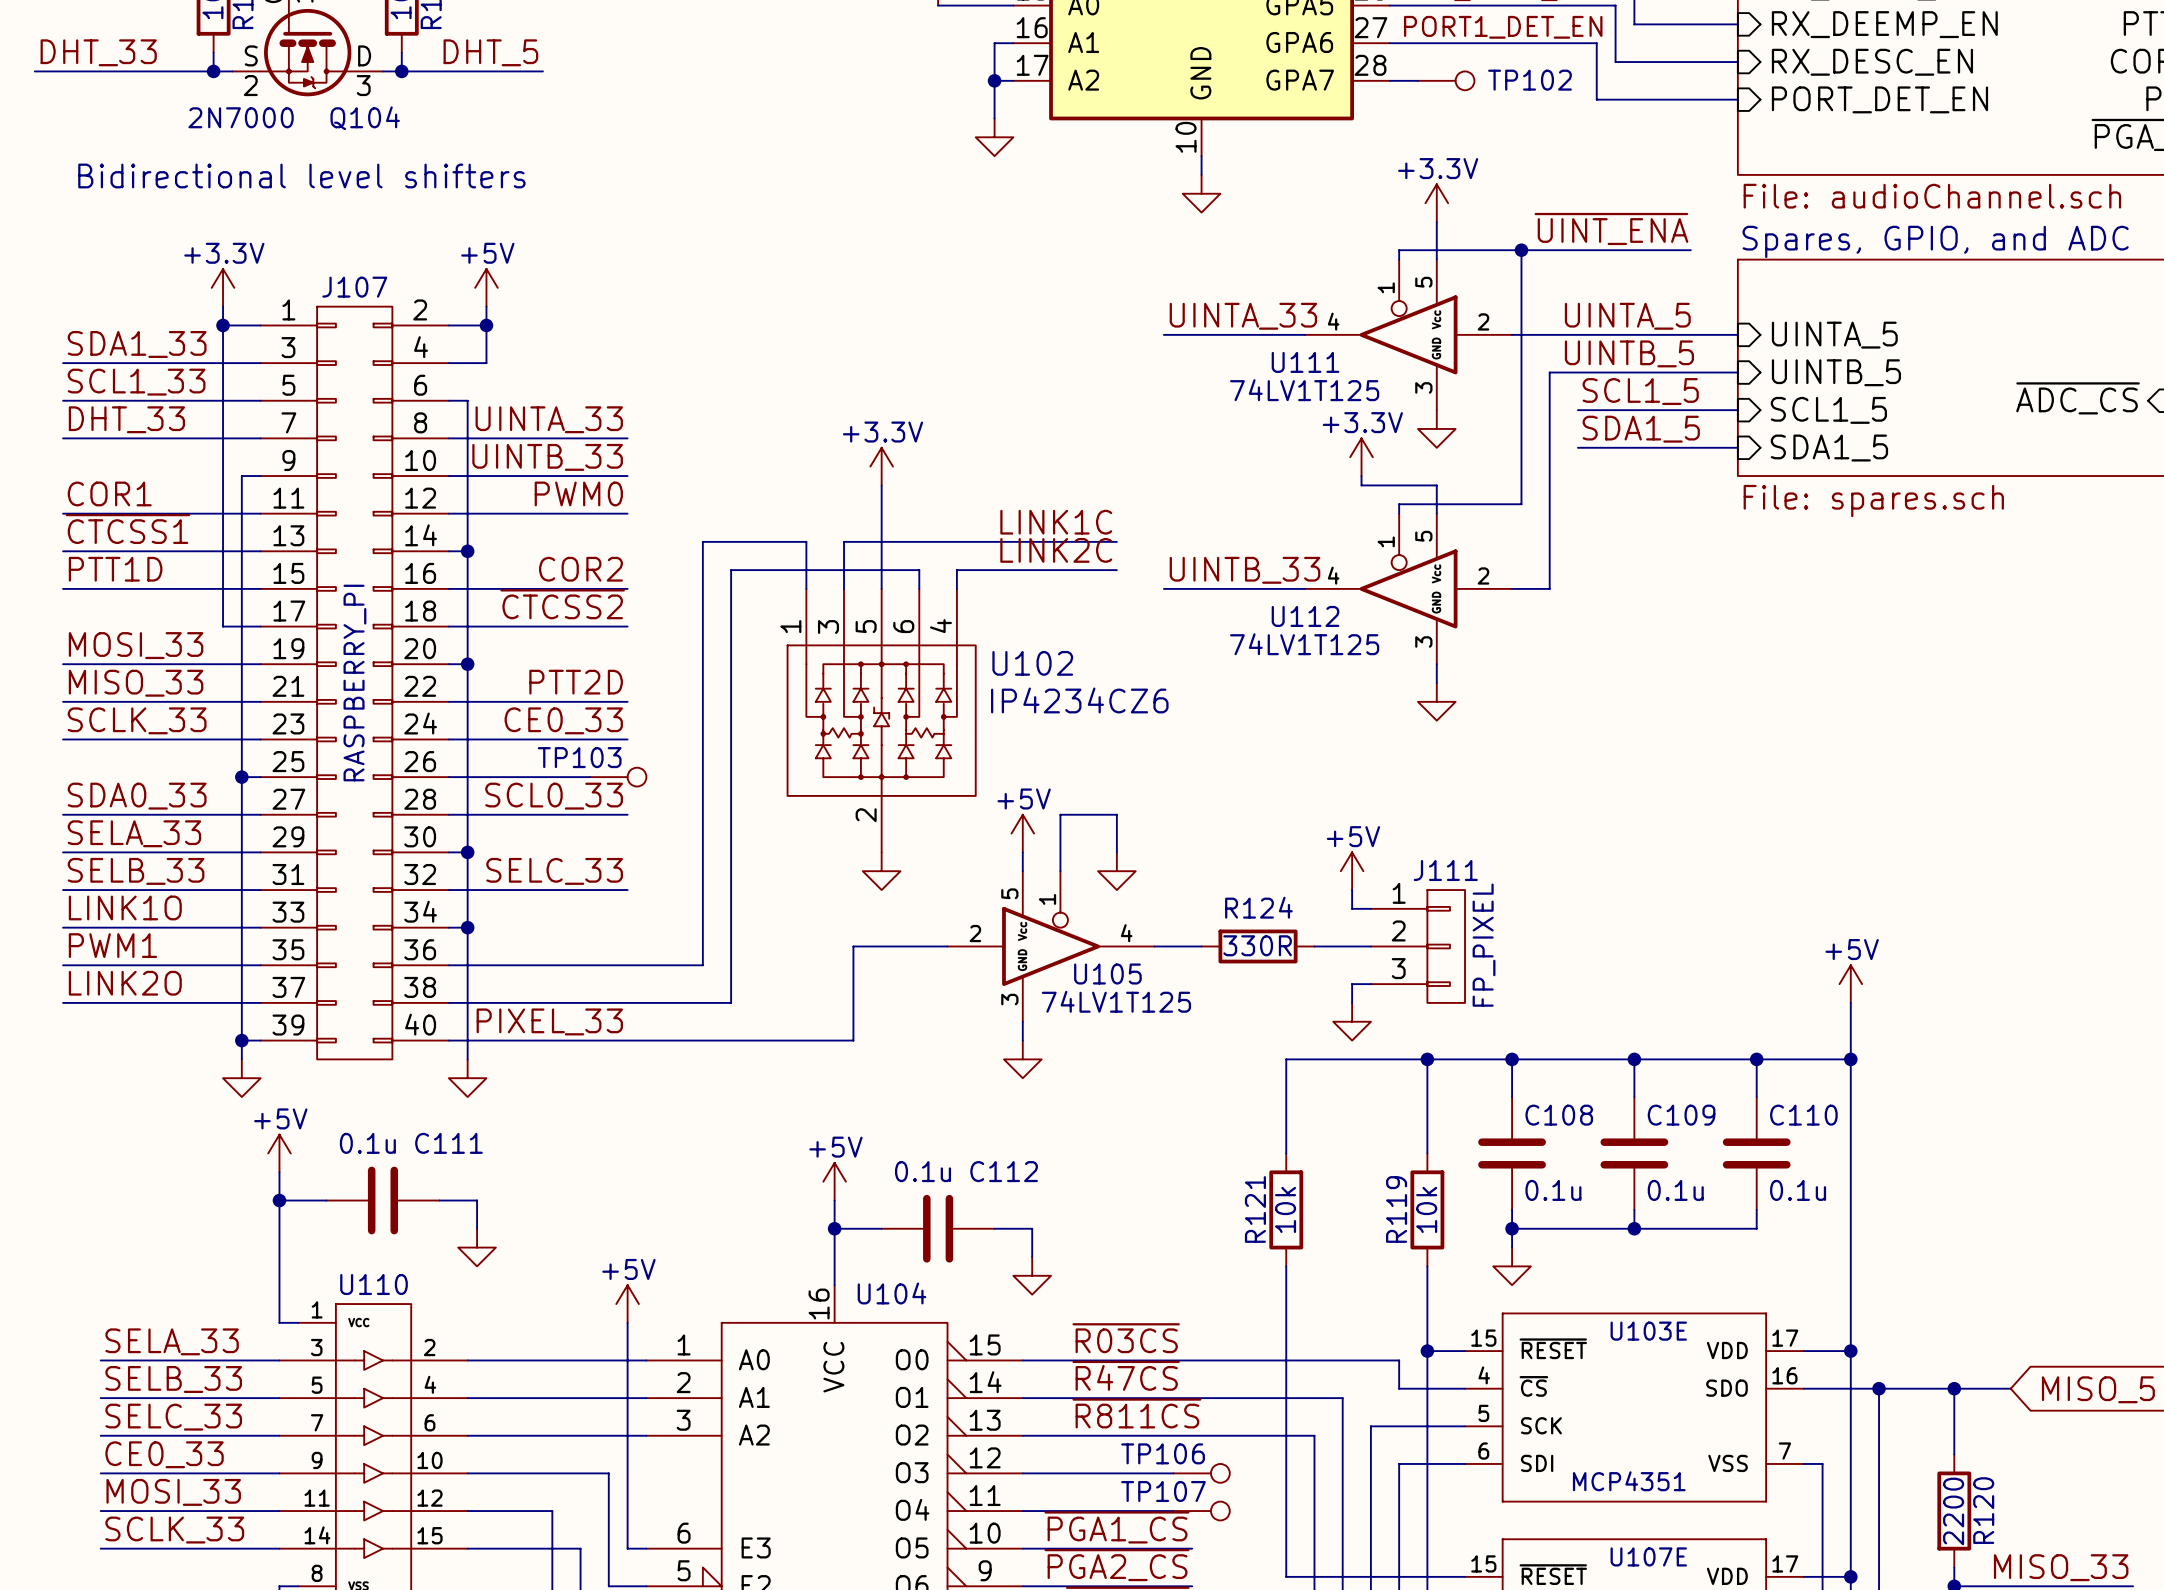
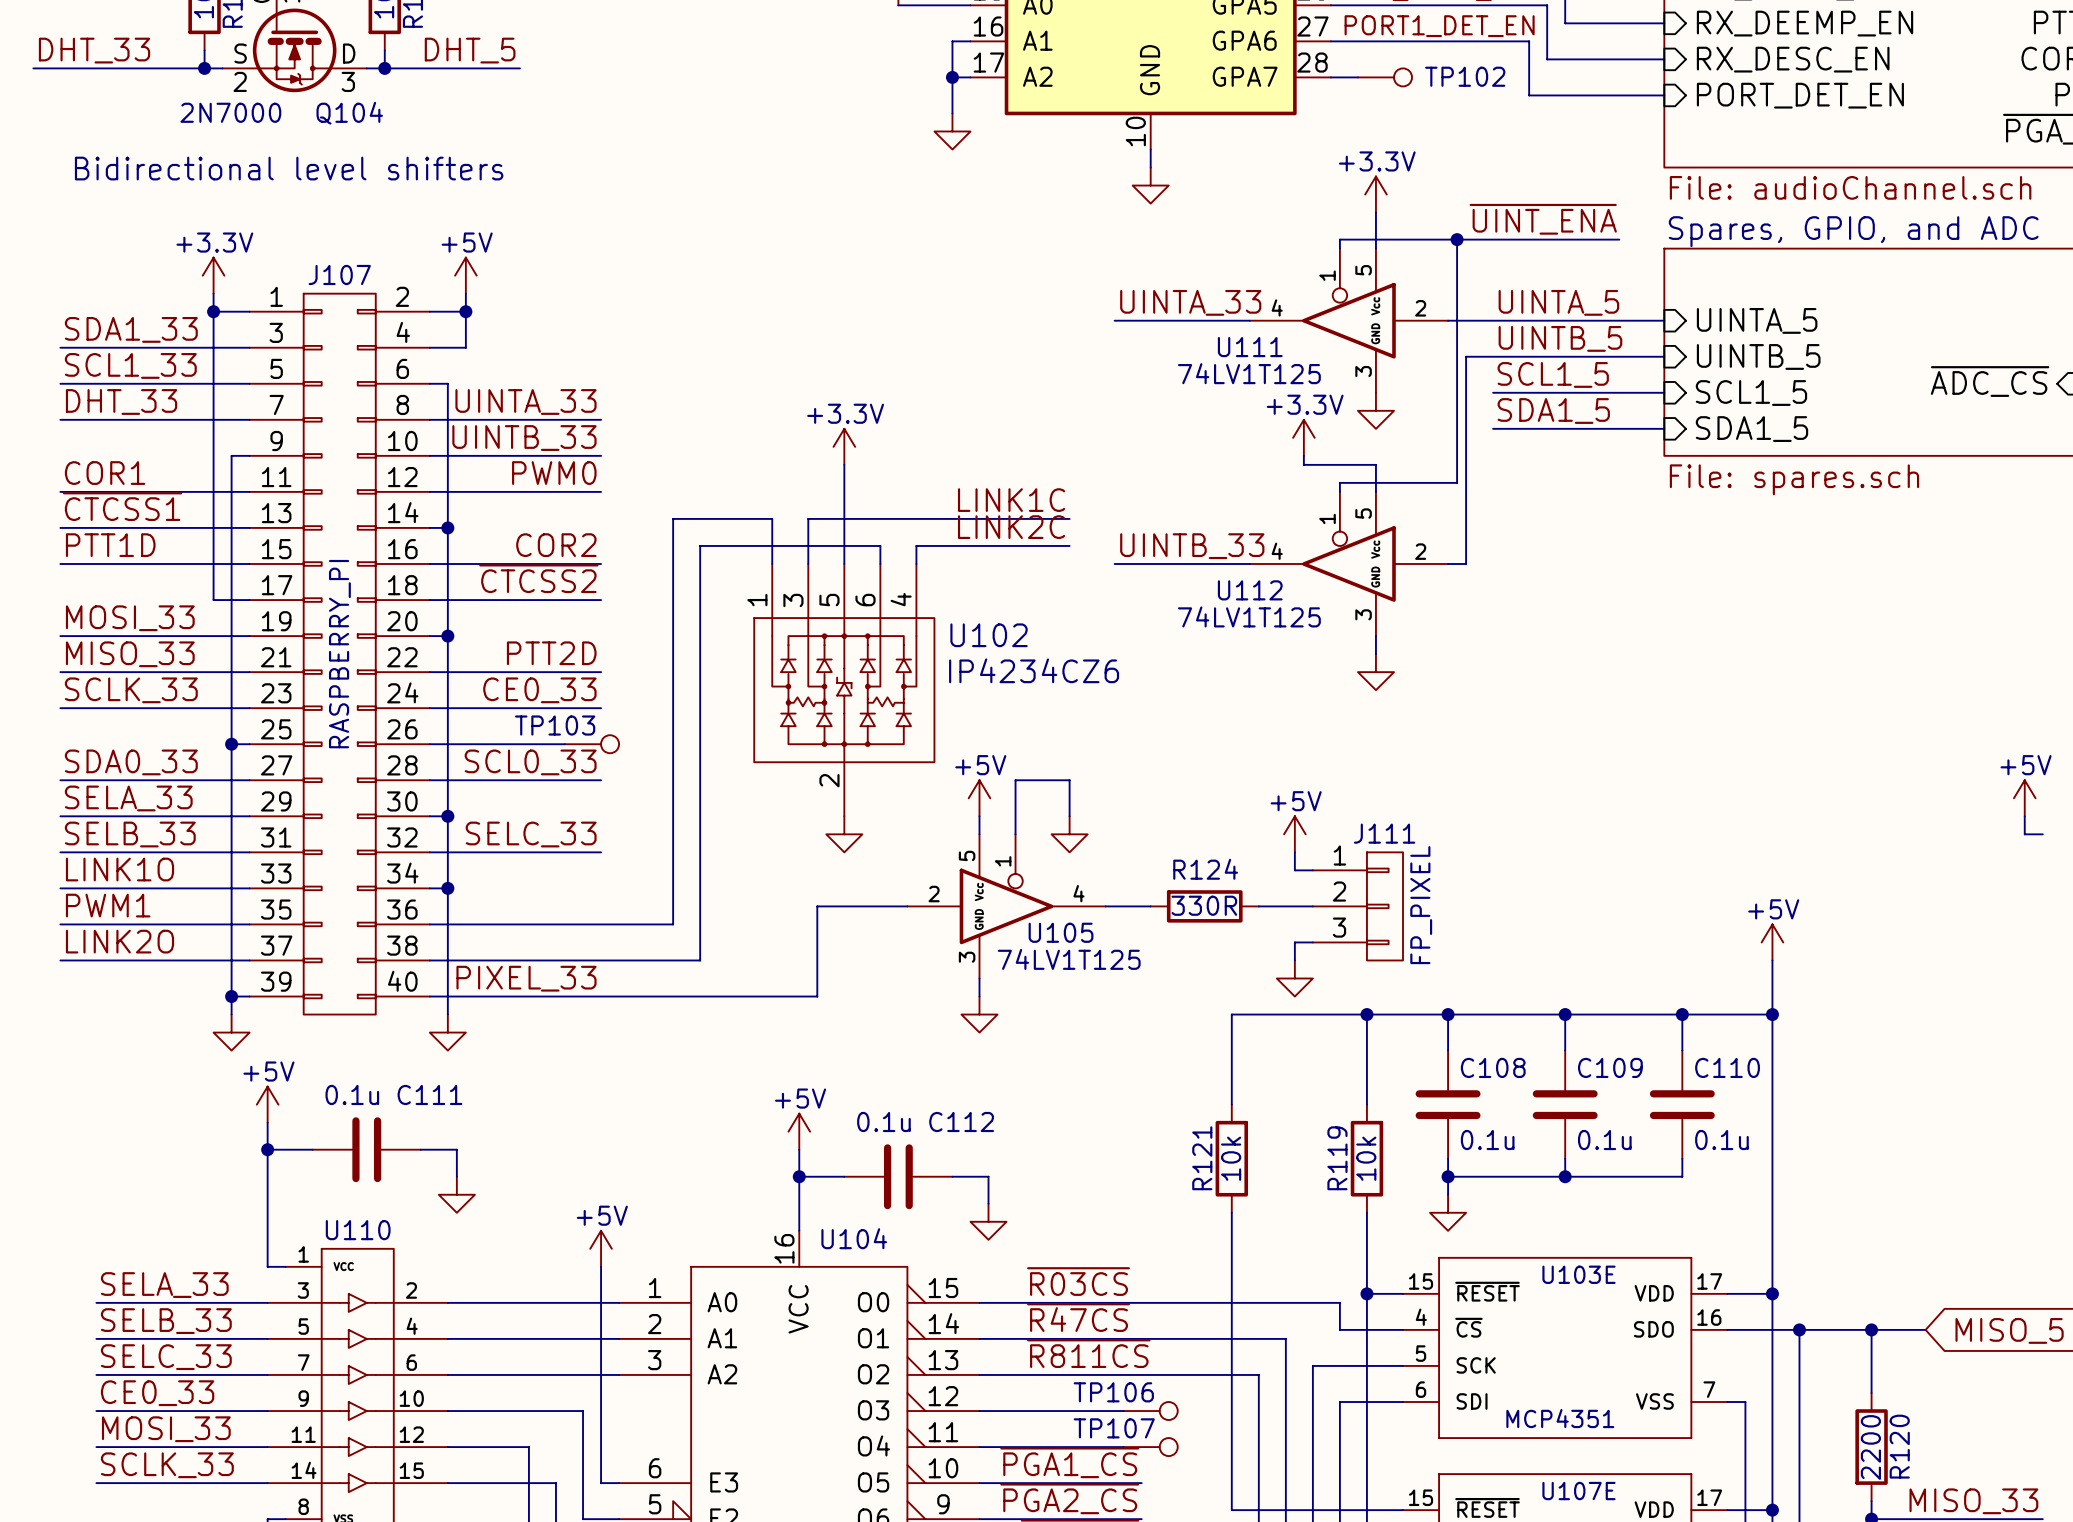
wire: (1549, 372) (1549, 588) (1530, 588) -> (1484, 356) (1466, 356) (1466, 564)
label position: SCL1_5 (1640, 391) -> SCL1_5 (1553, 374)
wire: none -> (1493, 392) (1511, 392)
label position: SDA1_5 (1641, 429) -> SDA1_5 (1553, 411)
wire: none -> (1493, 428) (1511, 428)
power symbol: none -> +5V (2024, 798)
wire: none -> (2024, 816) (2024, 834) (2042, 834)

